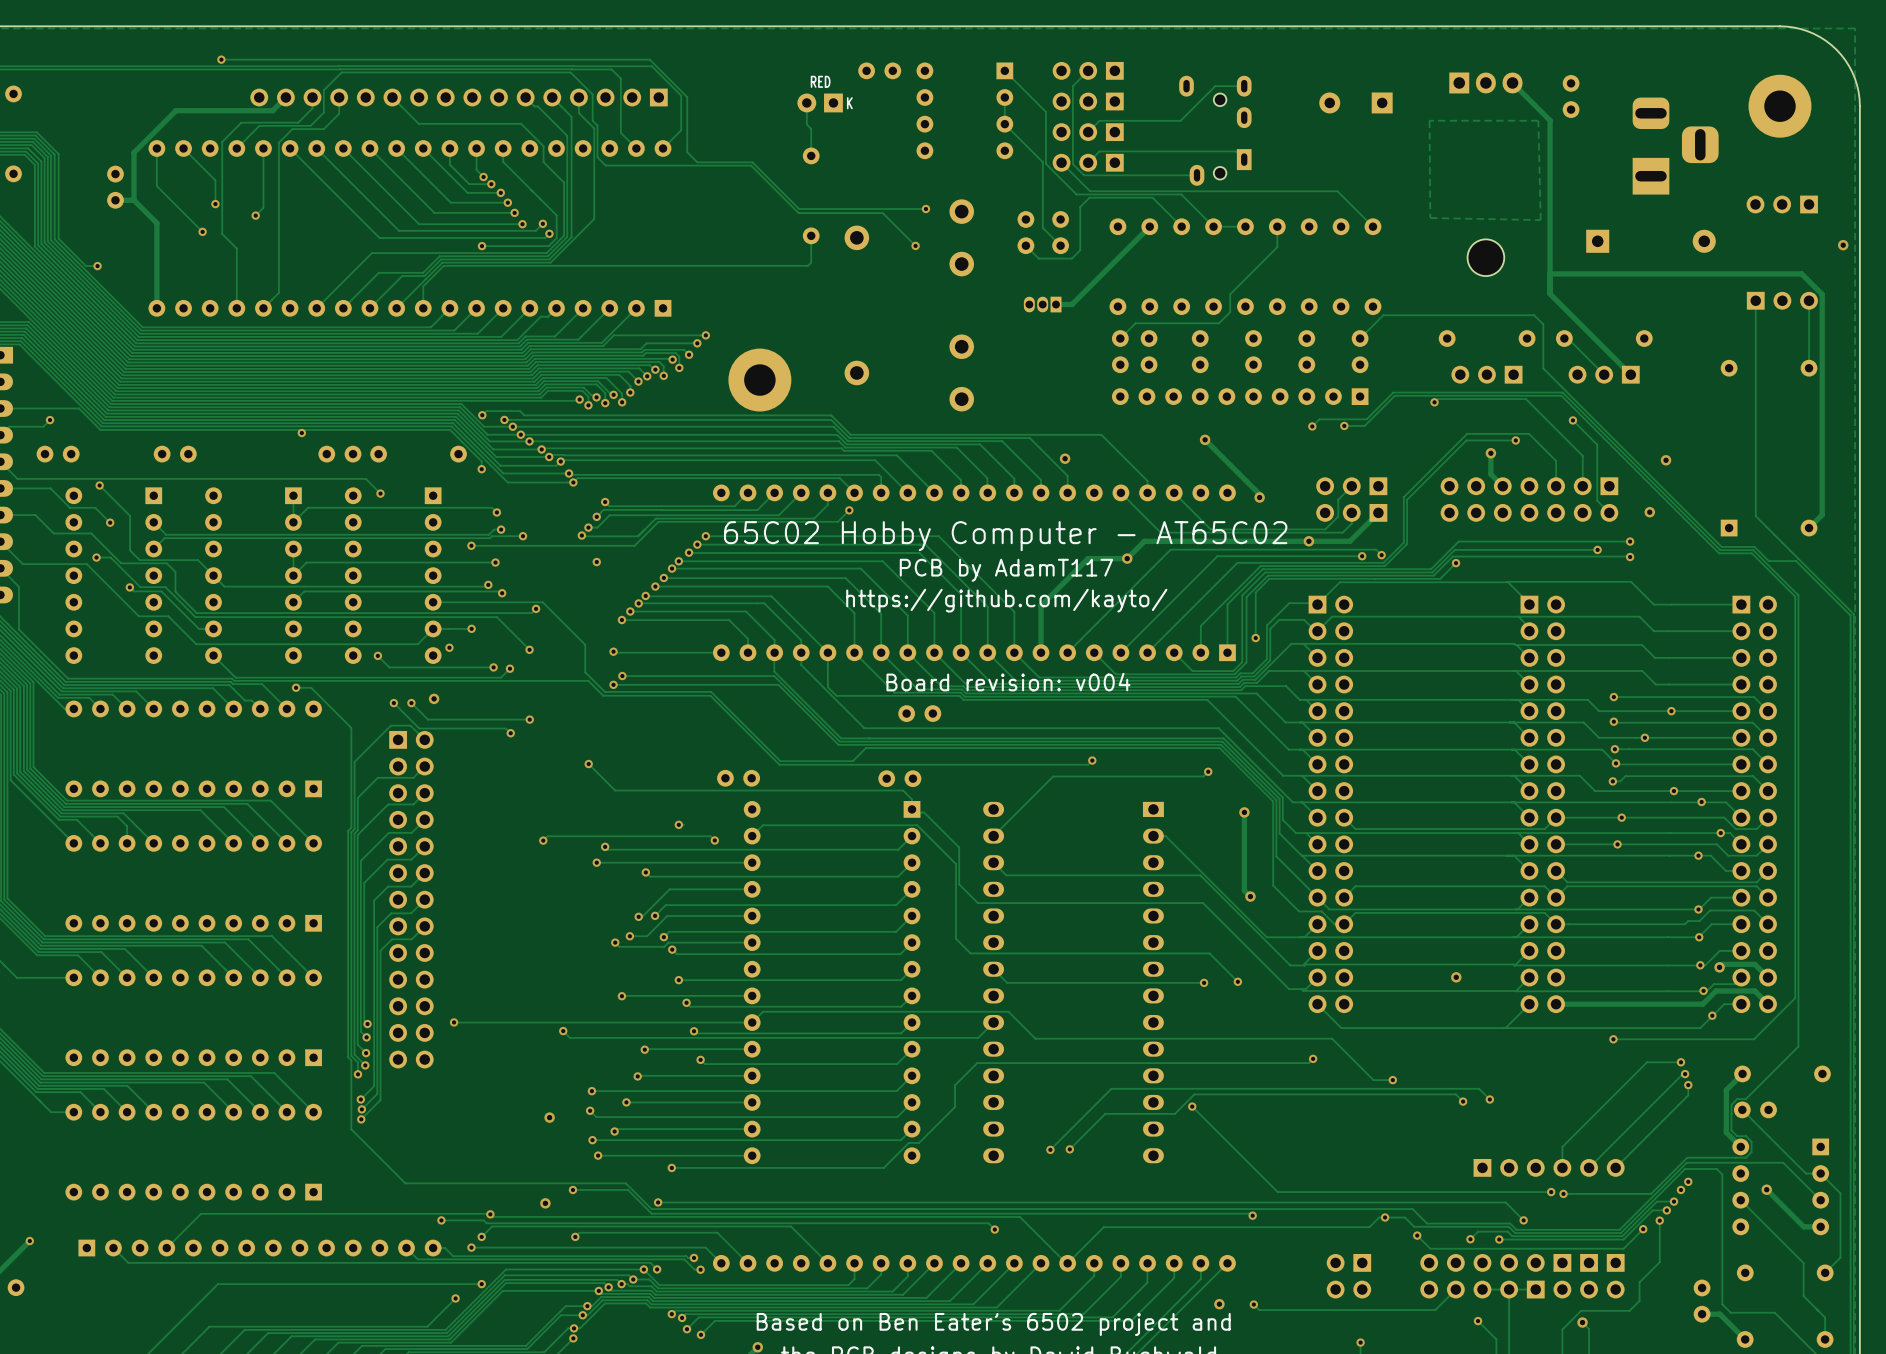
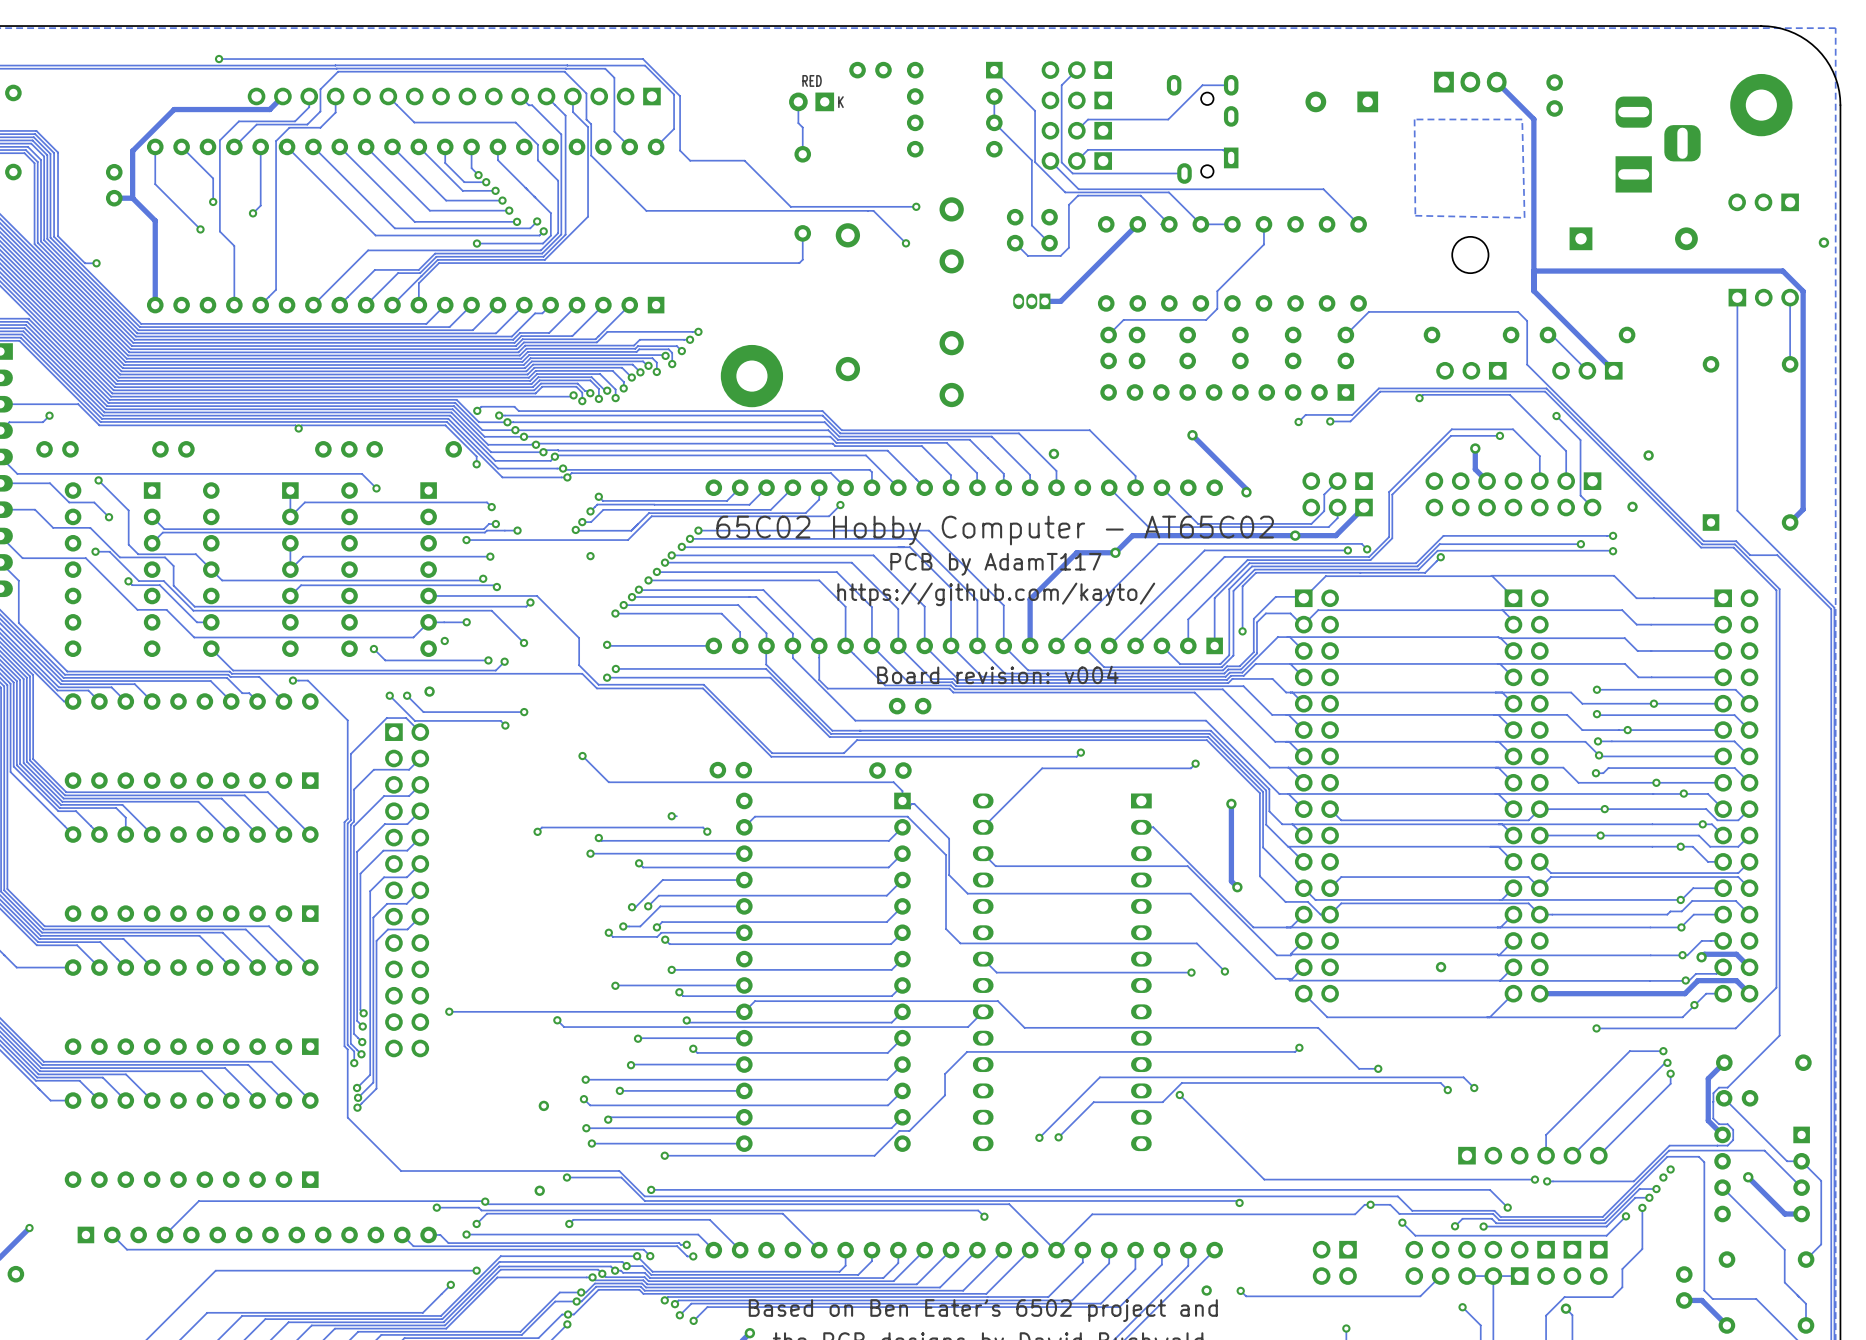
track: (605, 165) (751, 165) (798, 213) -> (599, 163) (646, 210) (790, 210)

